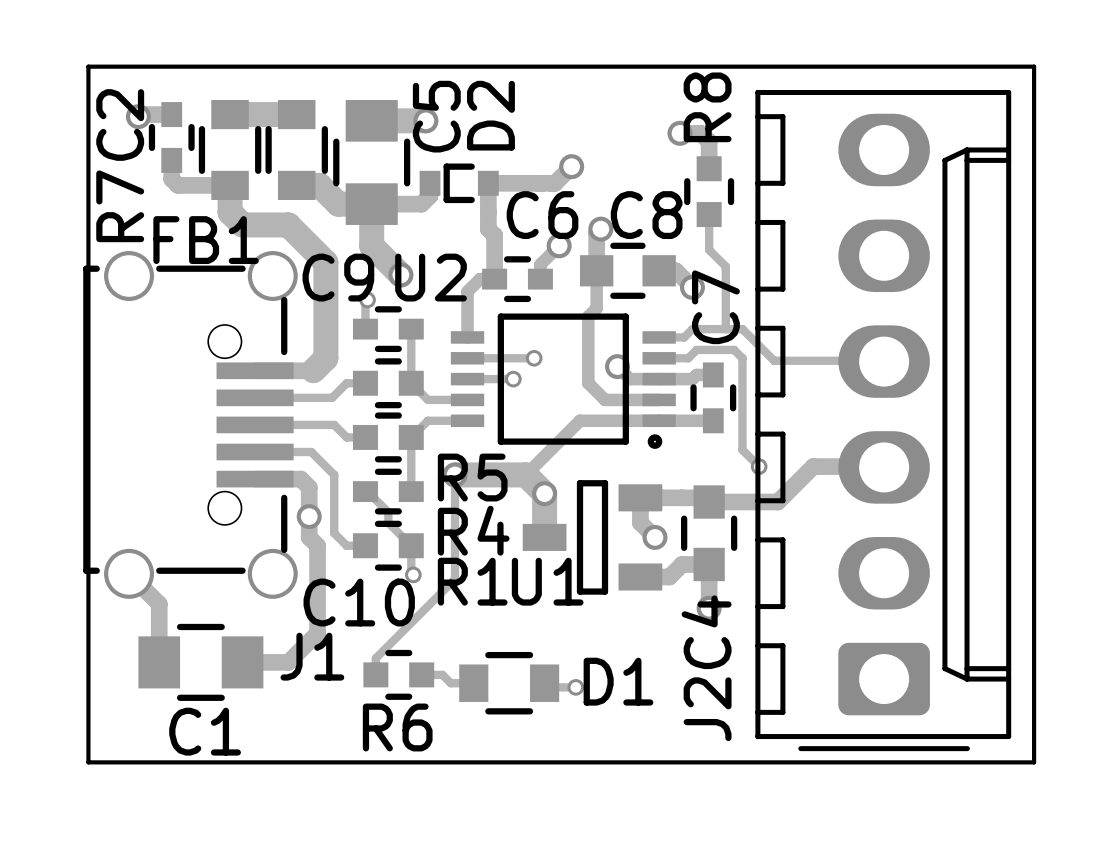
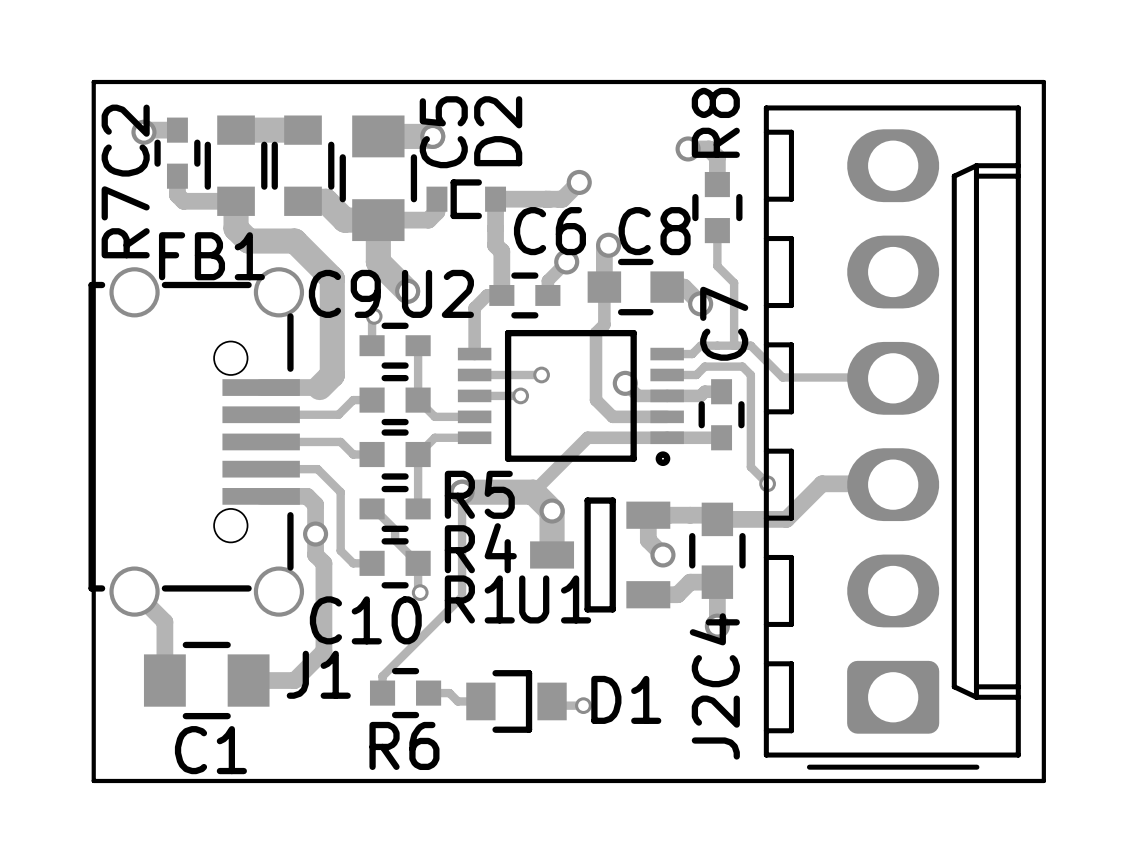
D1 footprint: [459, 651, 560, 715] -> [466, 670, 567, 733]

